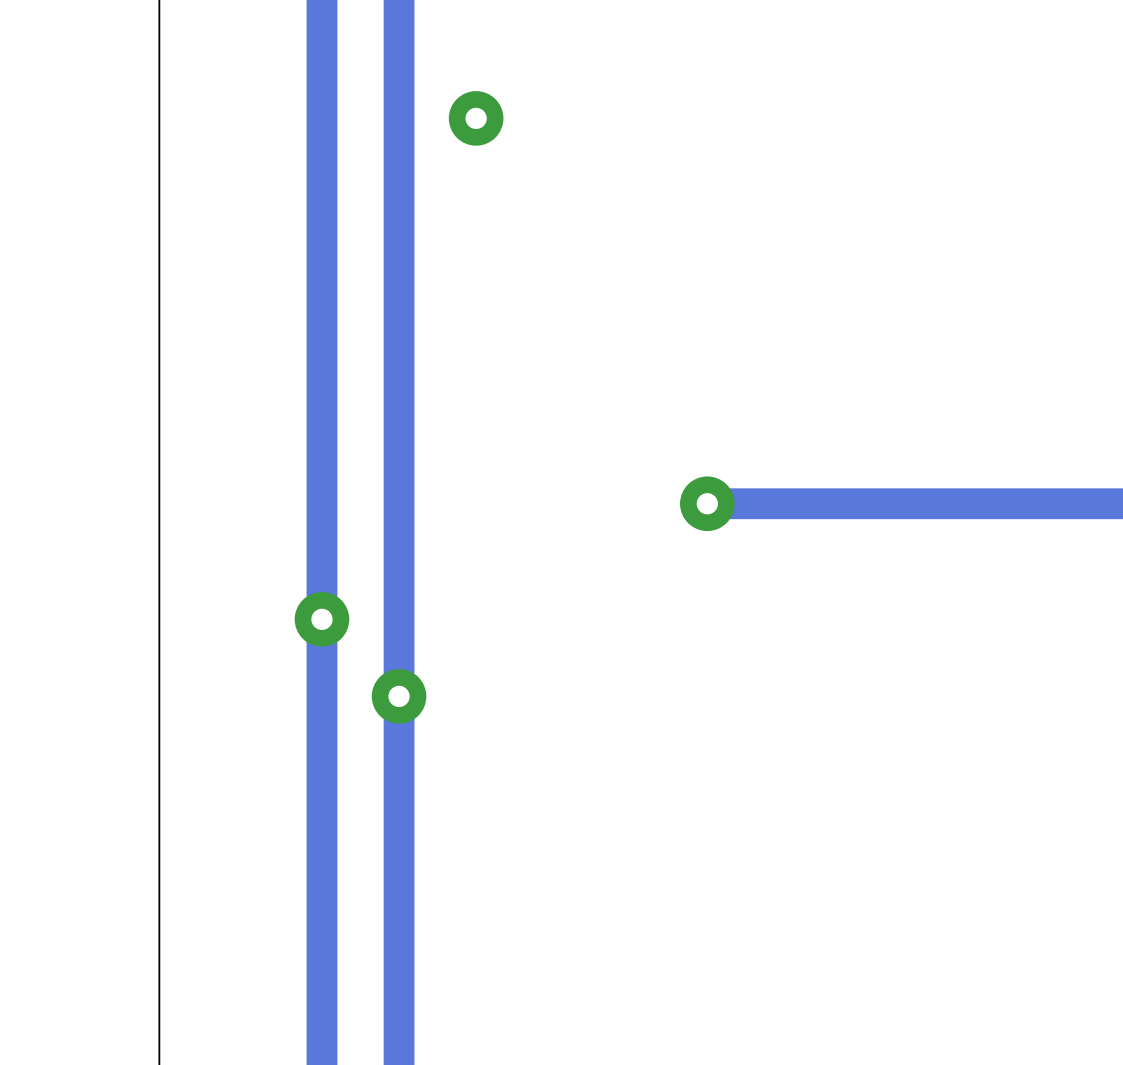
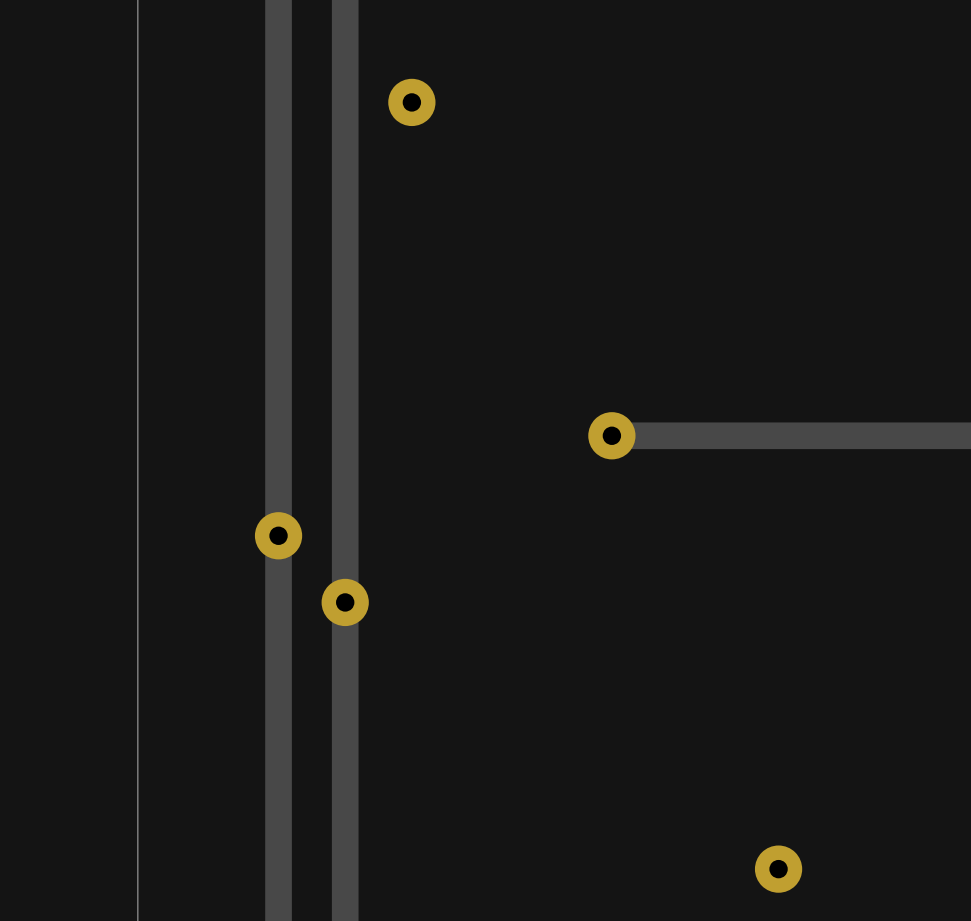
via: none -> (778, 869)

